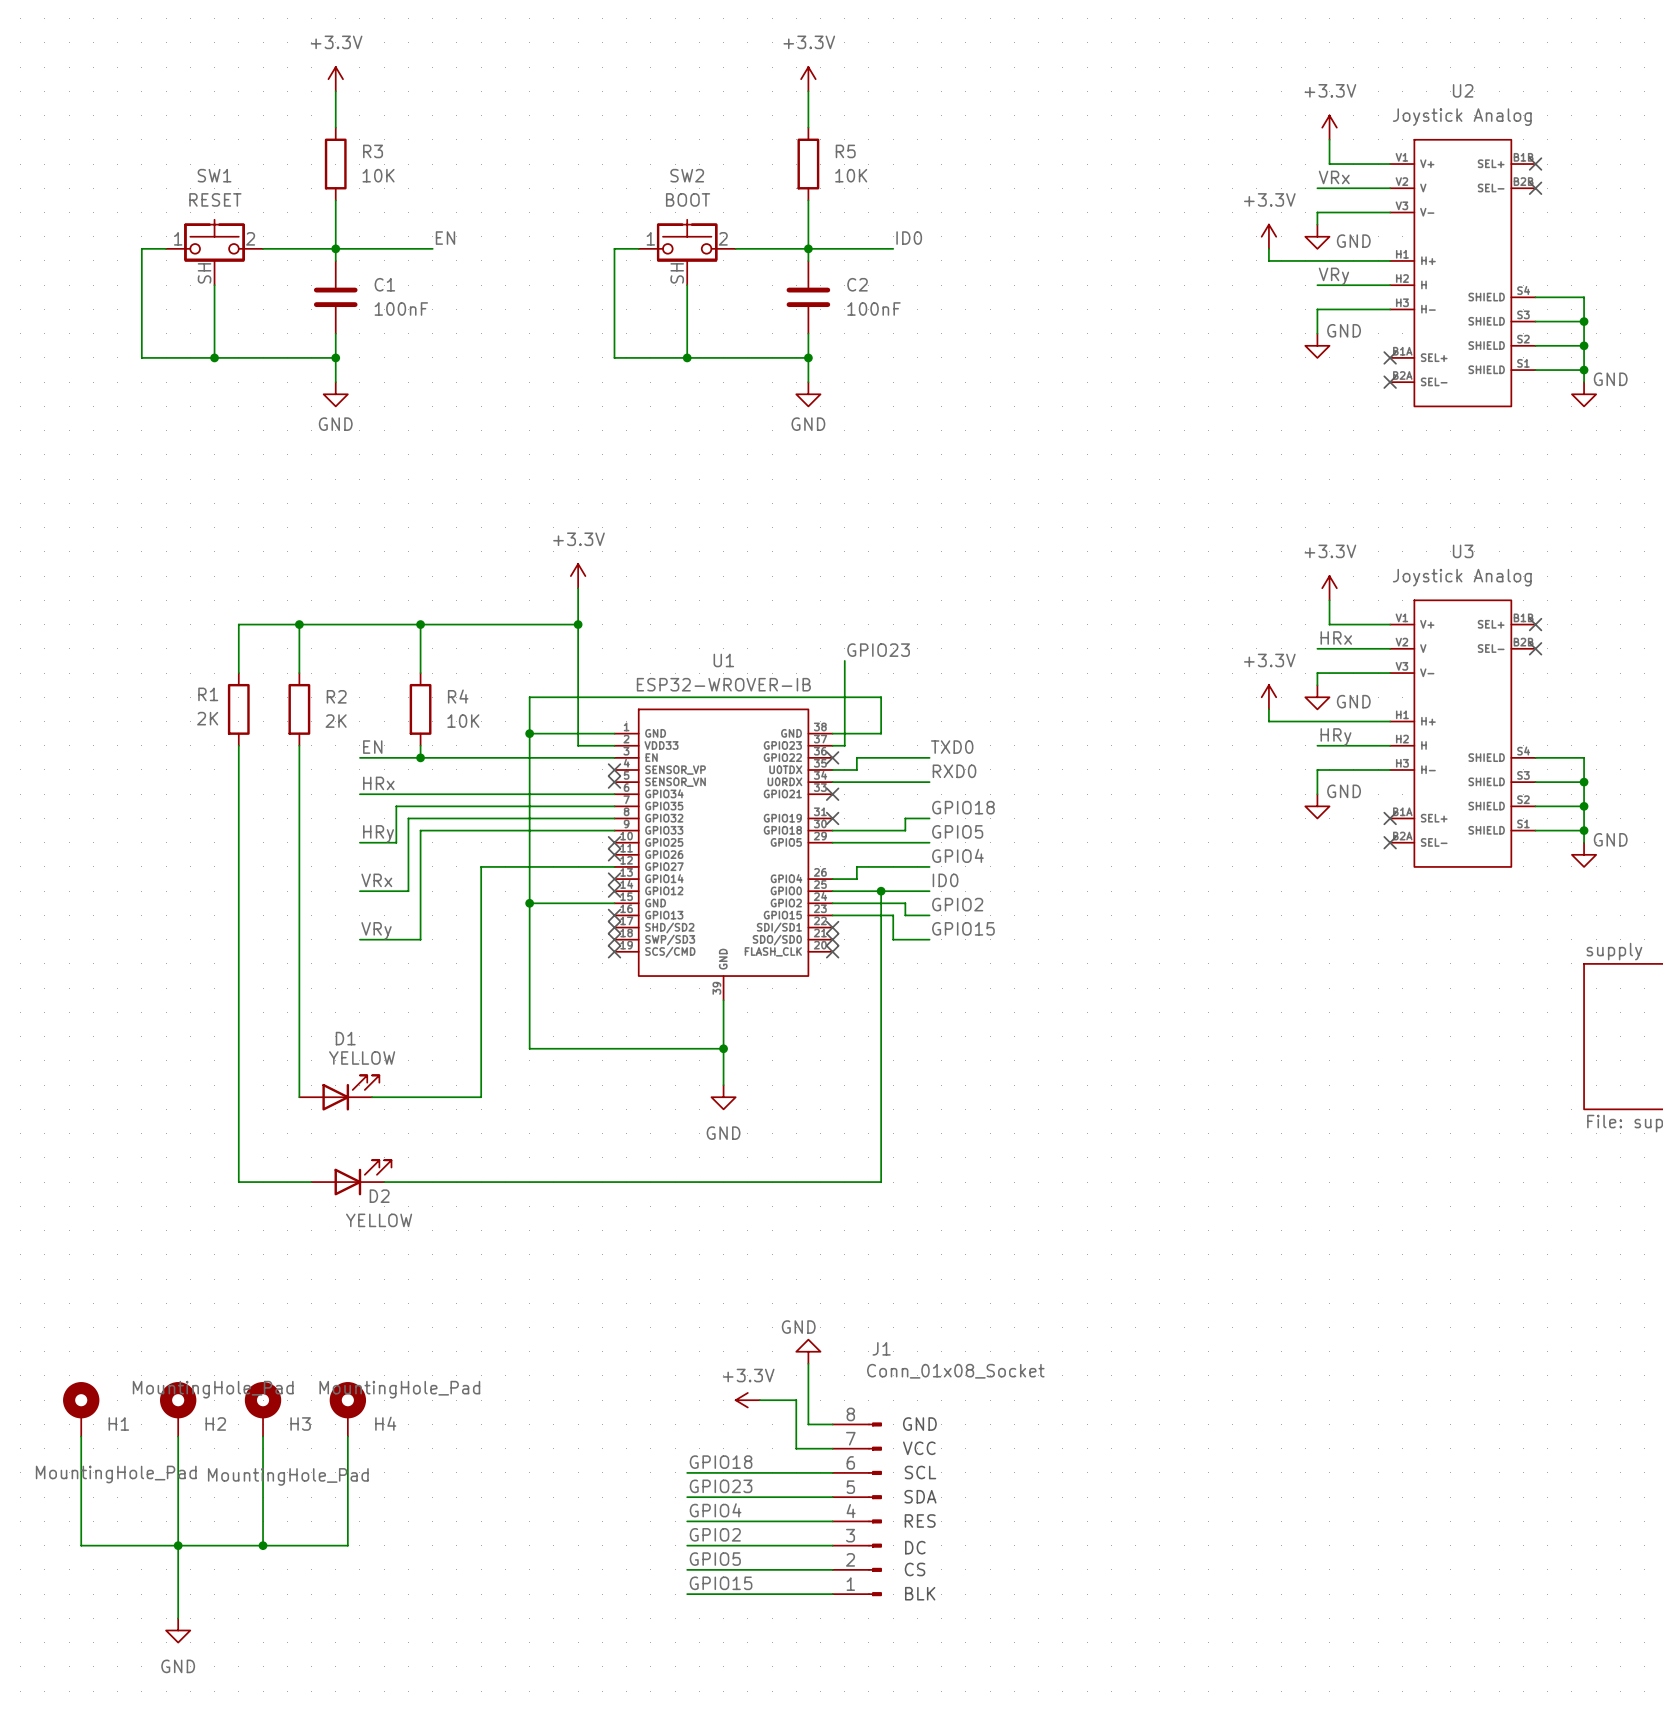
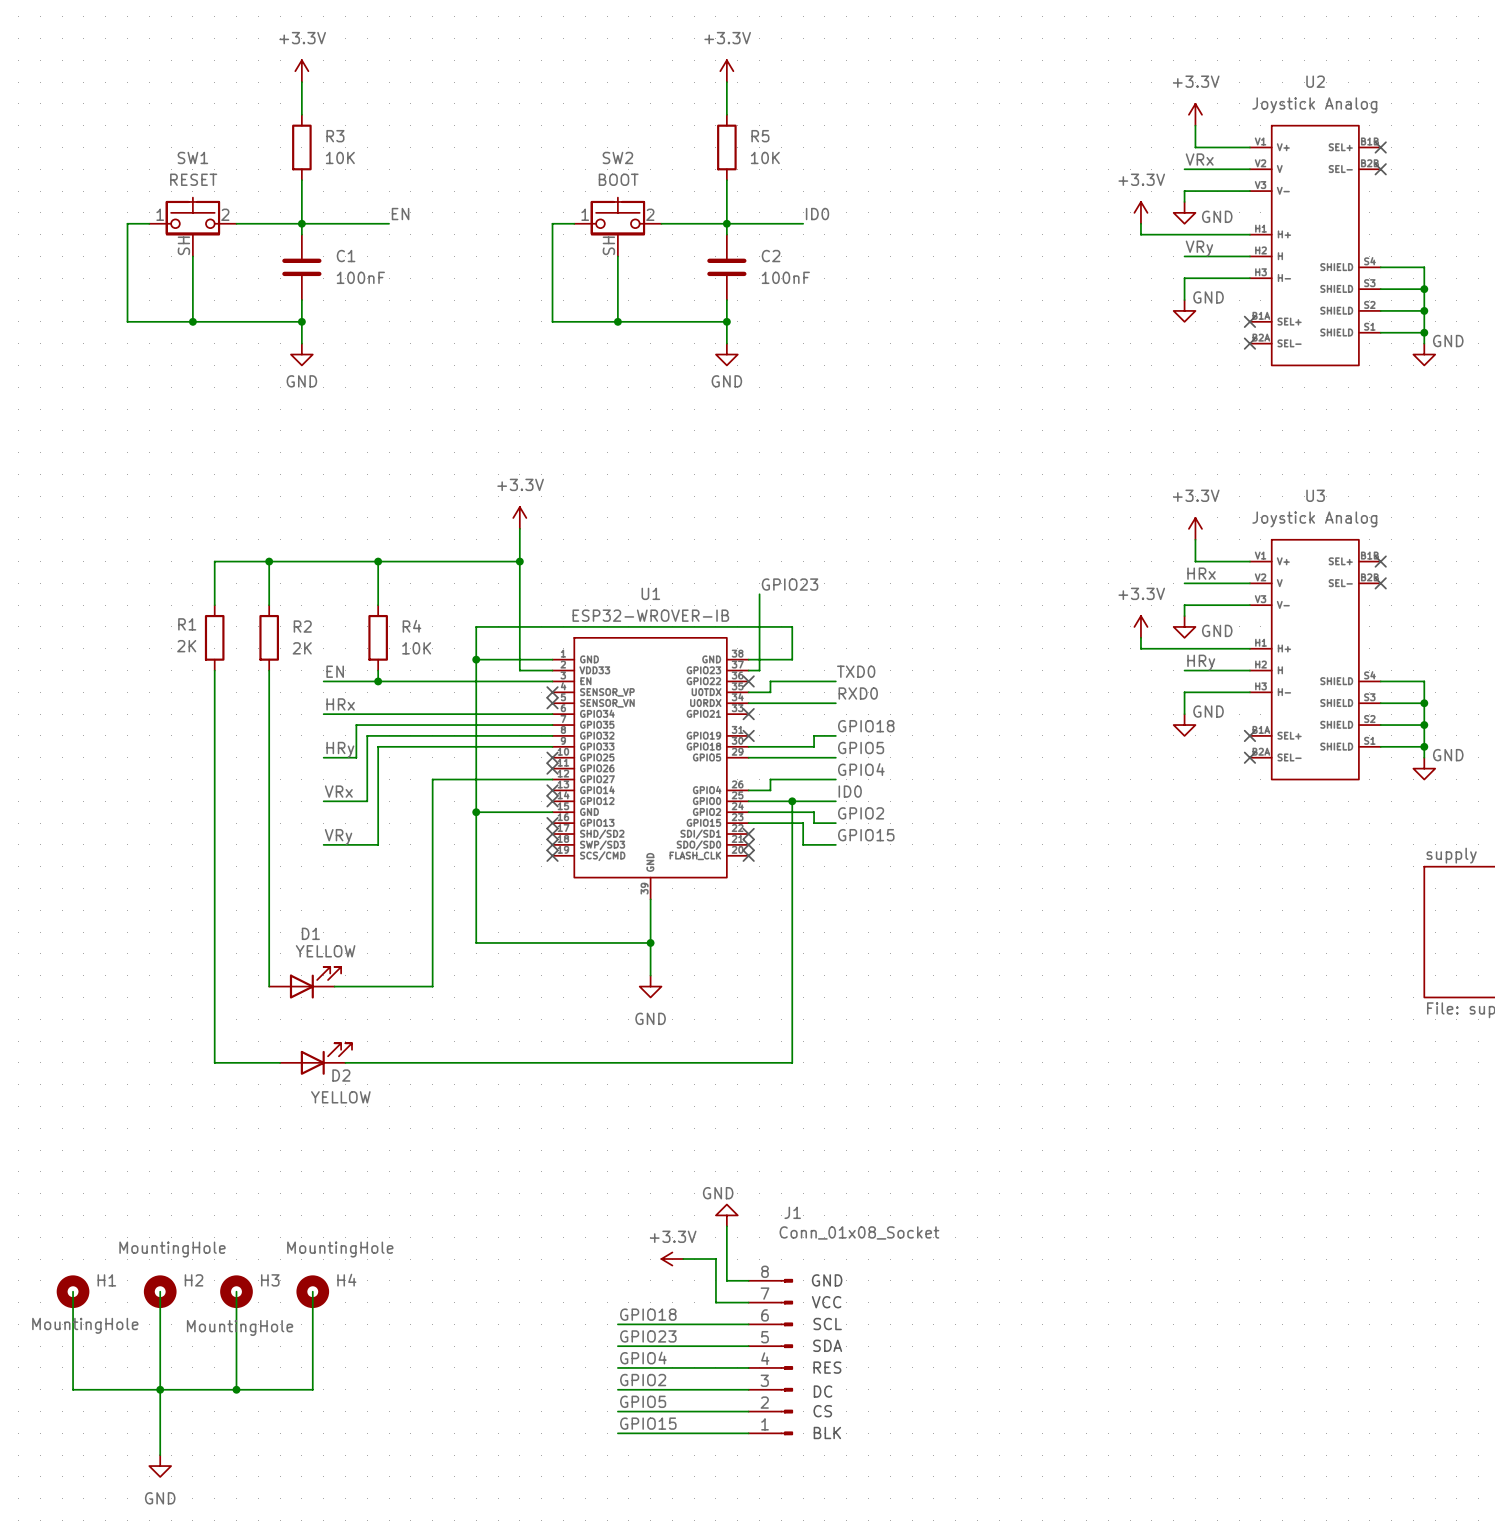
H1 symbol: [63, 1382, 100, 1437] -> [56, 1275, 90, 1309]
H2 symbol: [160, 1382, 197, 1437] -> [143, 1275, 177, 1309]
H3 symbol: [244, 1382, 282, 1437] -> [220, 1275, 253, 1309]
H4 symbol: [329, 1382, 367, 1437] -> [296, 1275, 330, 1309]
H2 value: MountingHole_Pad (213, 1389) -> MountingHole (172, 1249)
H4 value: MountingHole_Pad (399, 1389) -> MountingHole (340, 1249)
H1 value: MountingHole_Pad (116, 1474) -> MountingHole (85, 1325)
H3 value: MountingHole_Pad (288, 1476) -> MountingHole (240, 1327)

